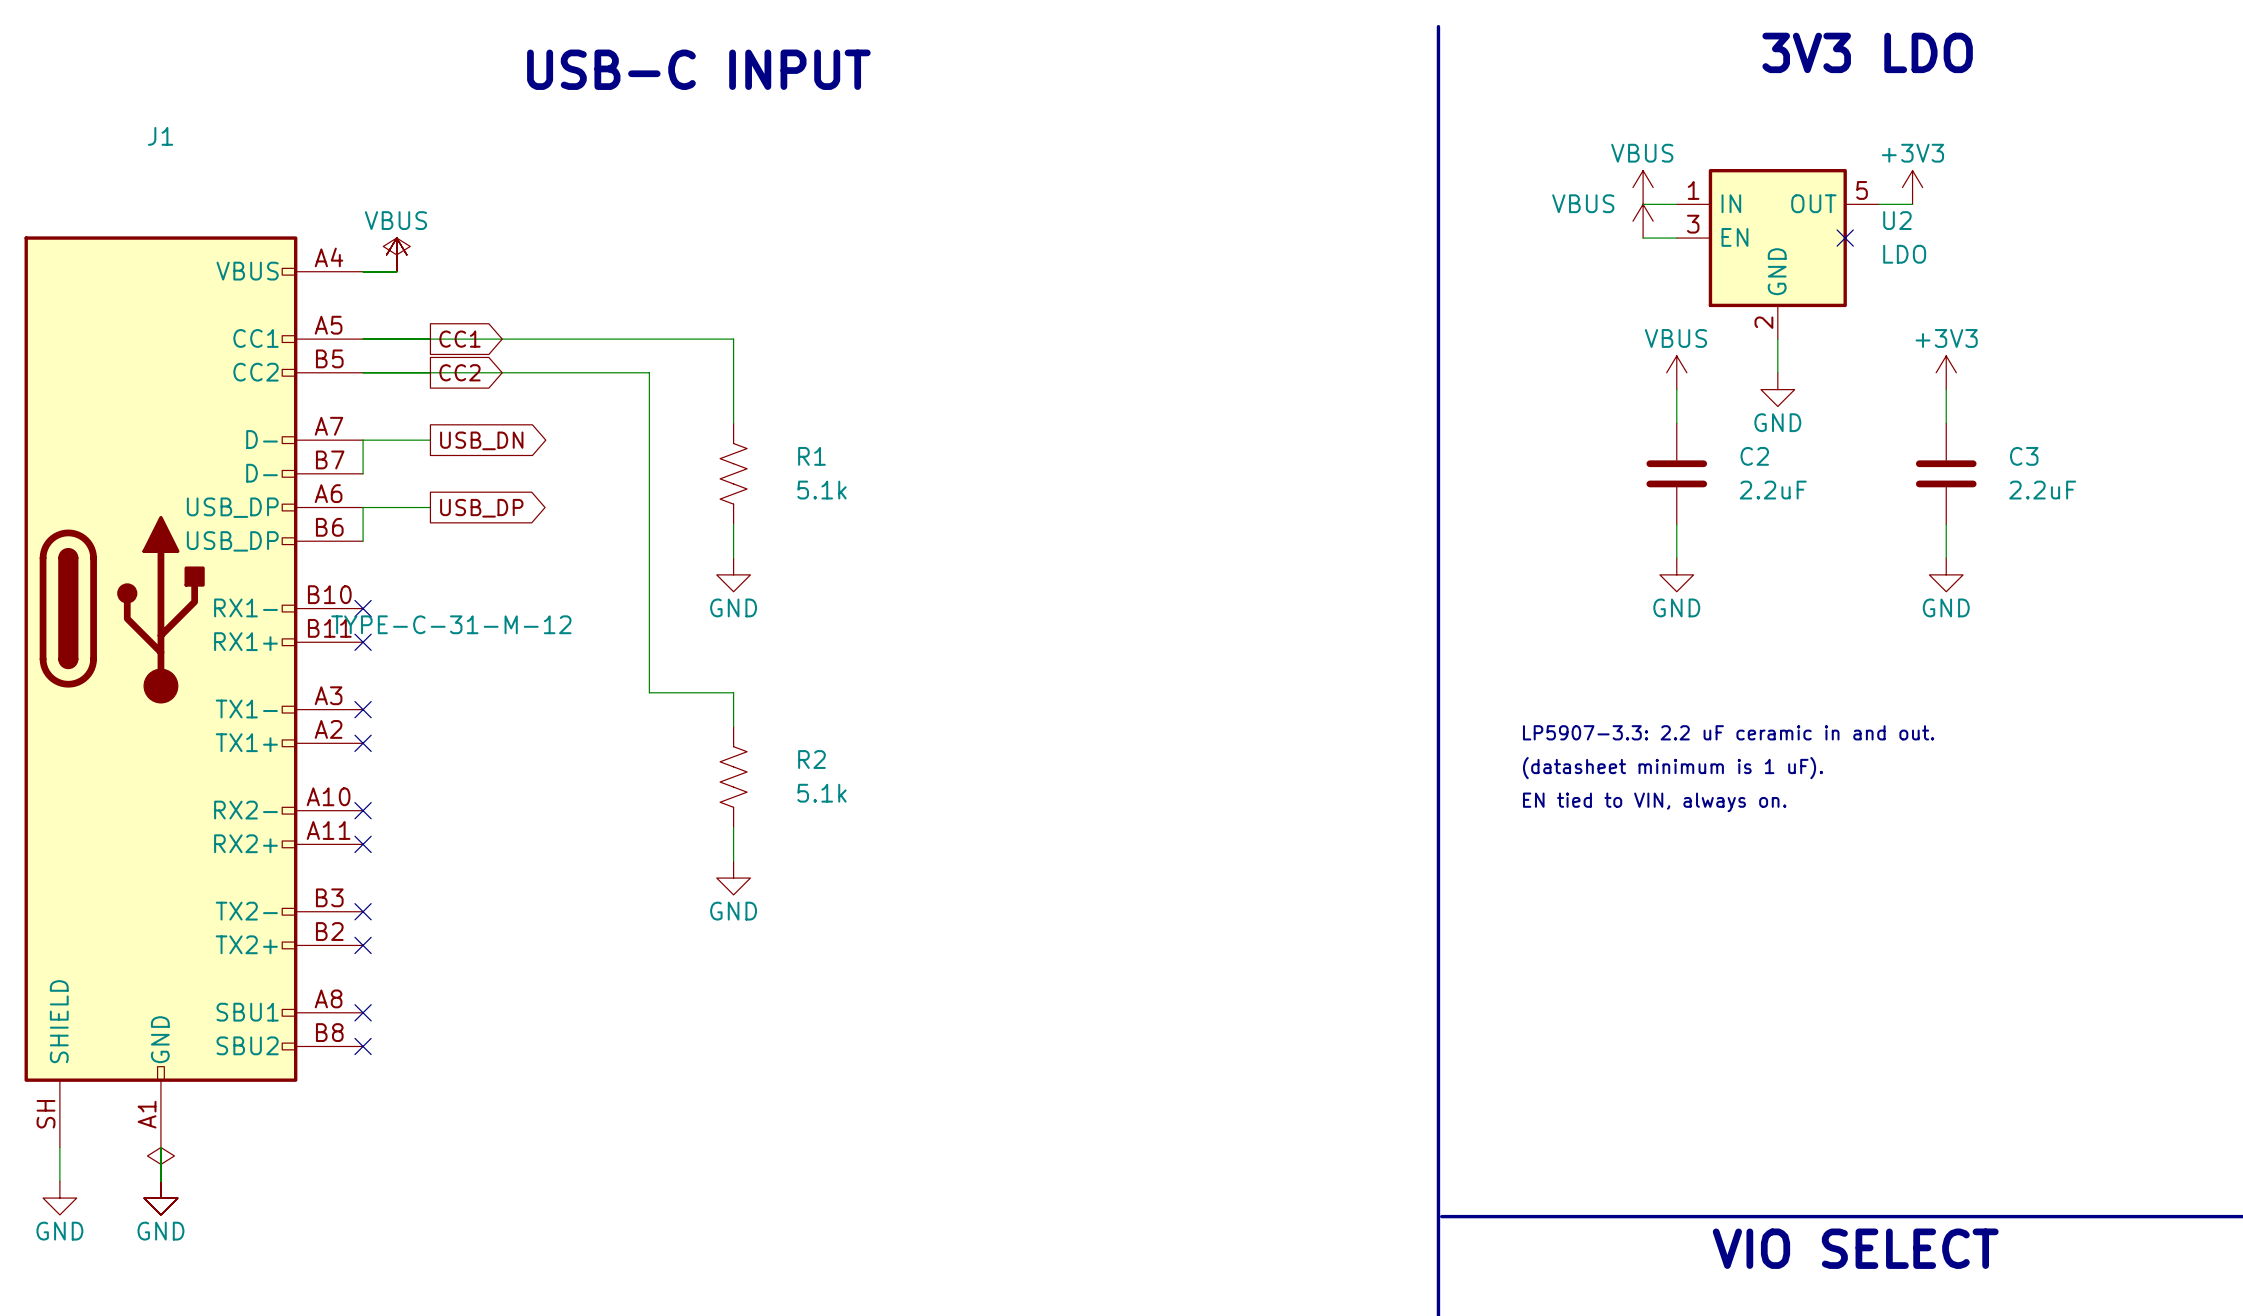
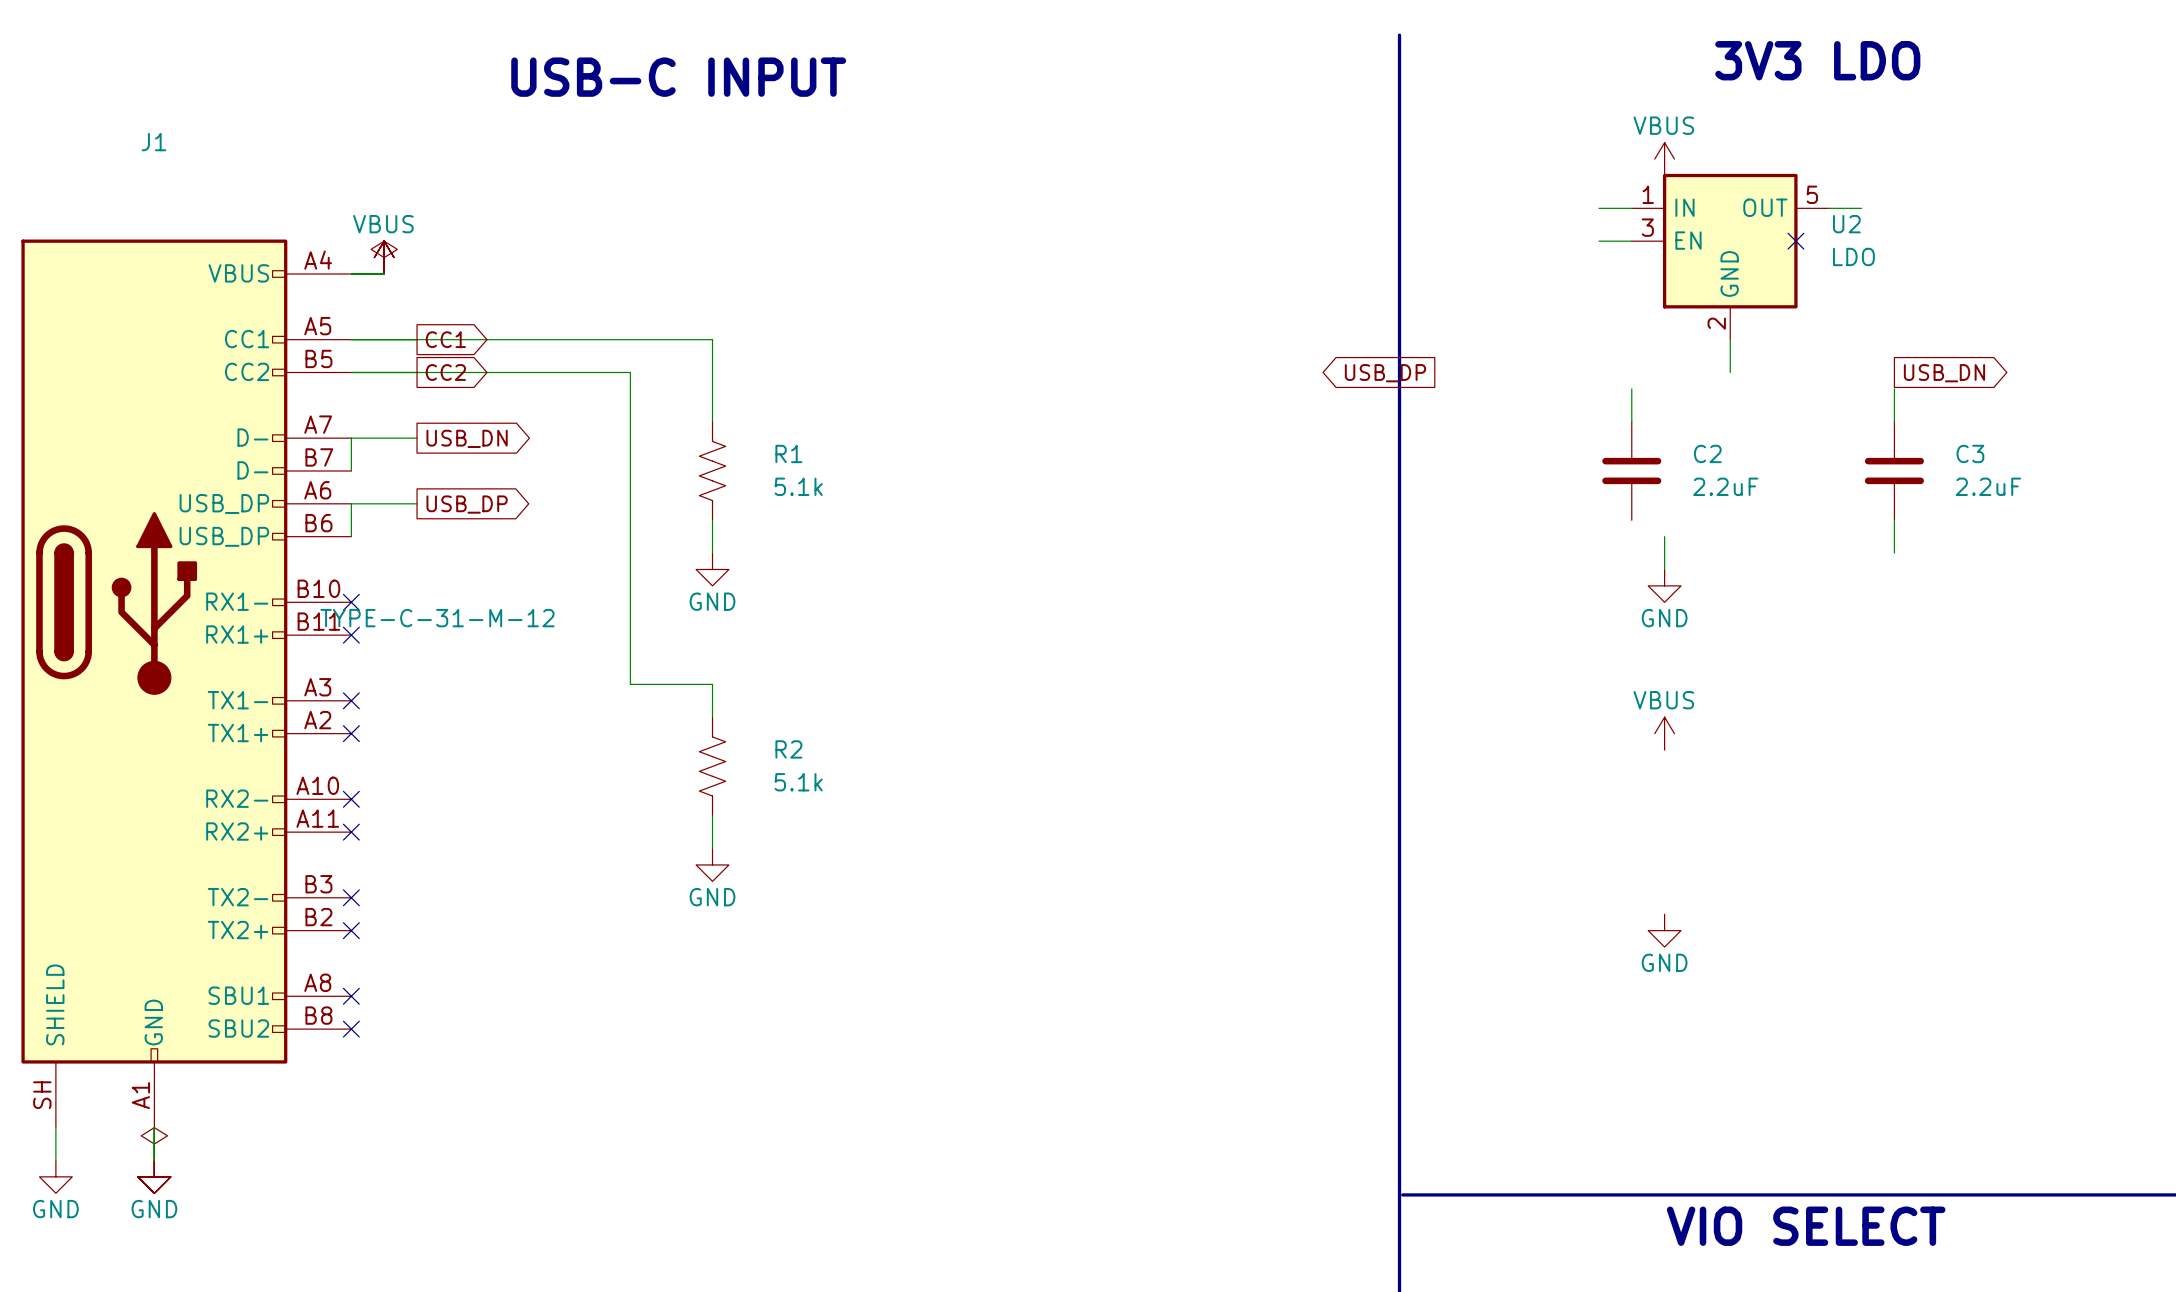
power symbol: none -> VBUS (1664, 159)
power symbol: VBUS (1643, 187) -> none
power symbol: +3V3 (1912, 187) -> none
power symbol: VBUS (1643, 221) -> none
power symbol: VBUS (1676, 372) -> none
power symbol: +3V3 (1946, 372) -> none
global label: none -> USB_DP (1385, 373)
global label: none -> USB_DN (1944, 373)
power symbol: GND (1777, 389) -> none
wire: (1676, 524) (1676, 558) -> (1664, 536) (1664, 569)
power symbol position: GND (1676, 574) -> GND (1664, 585)
power symbol: GND (1946, 574) -> none
text: LP5907-3.3: 2.2 uF ceramic in and out. (1728, 732) -> none
power symbol: none -> VBUS (1664, 733)
text: (datasheet minimum is 1 uF). (1673, 768) -> none
text: EN tied to VIN, always on. (1654, 802) -> none
power symbol: none -> GND (1664, 930)

